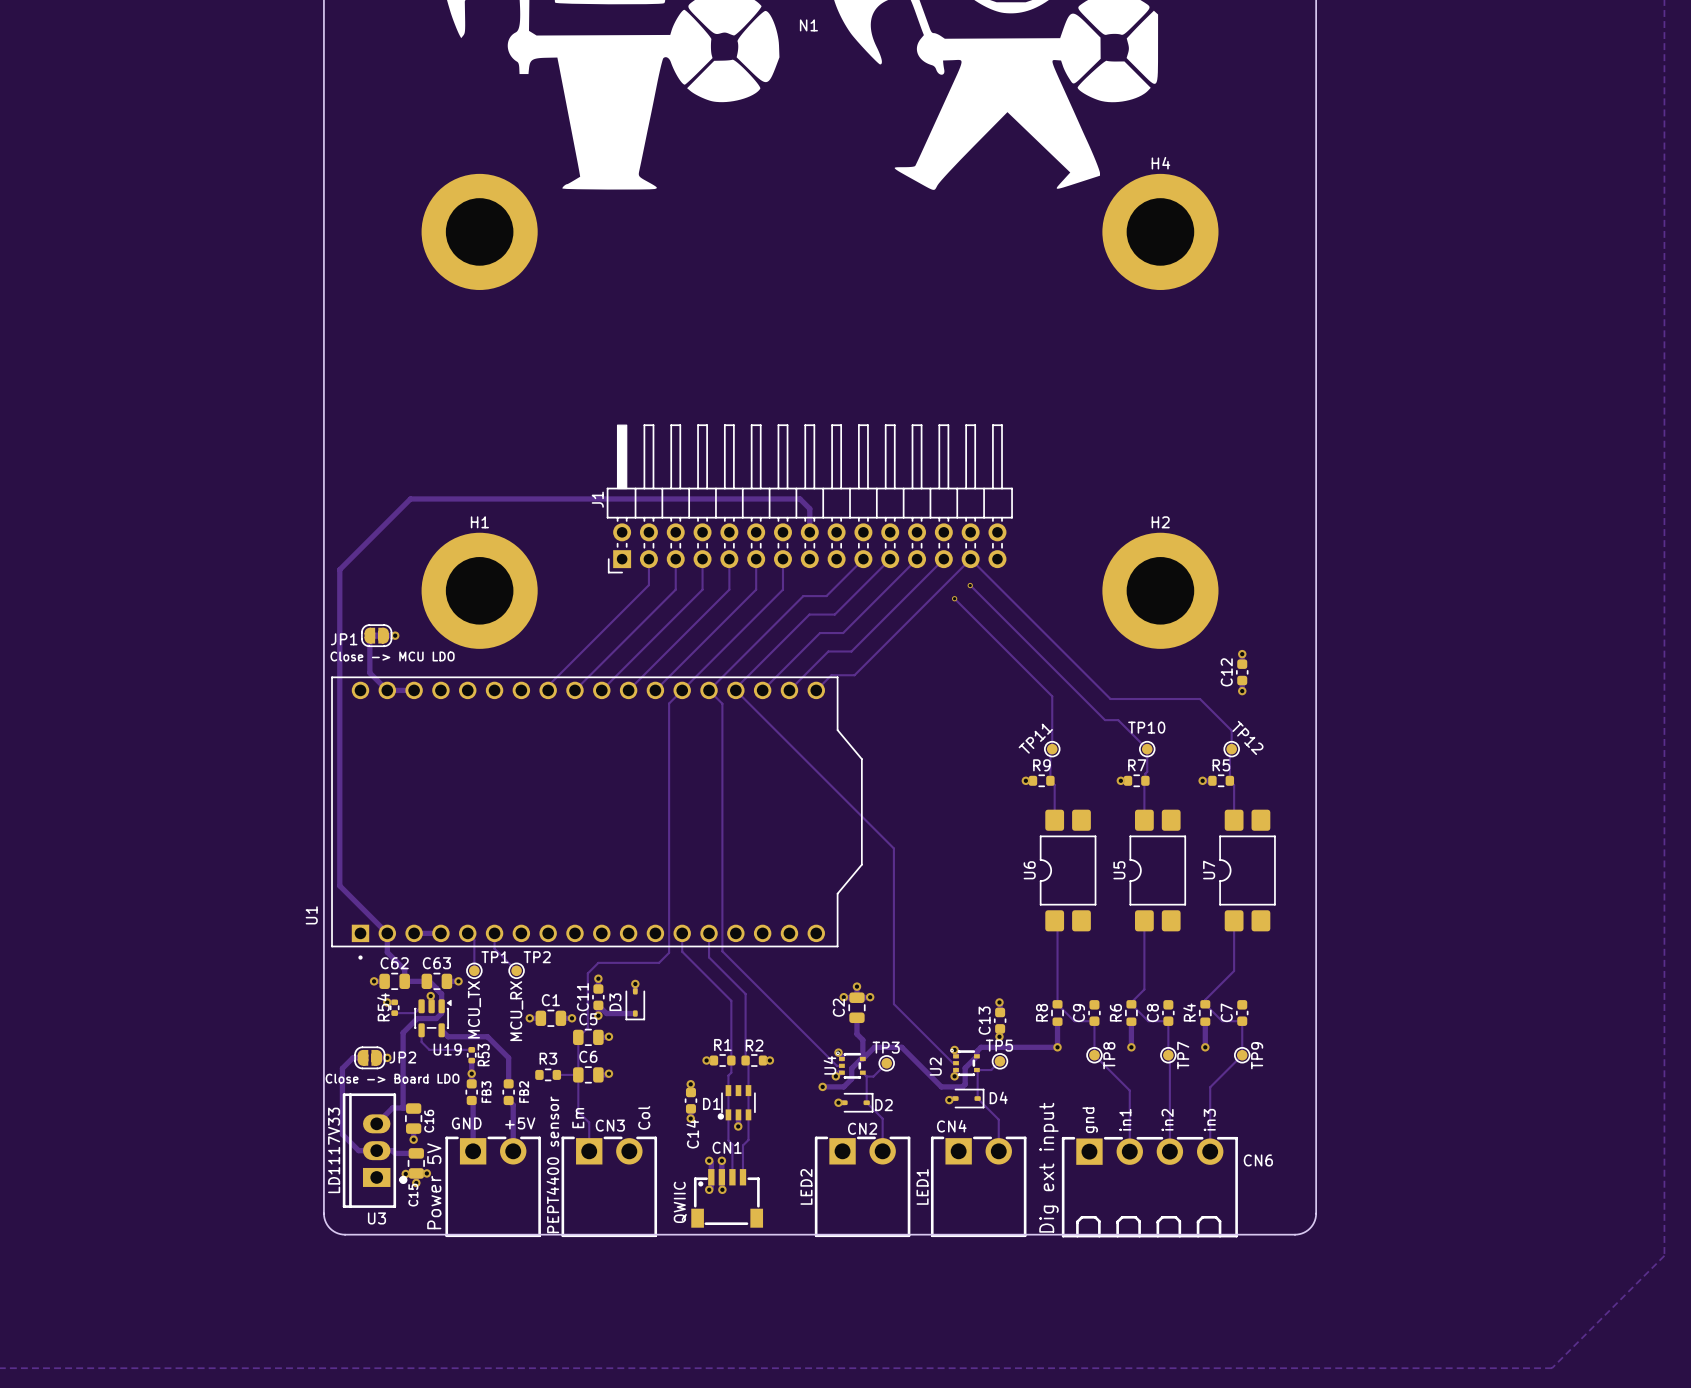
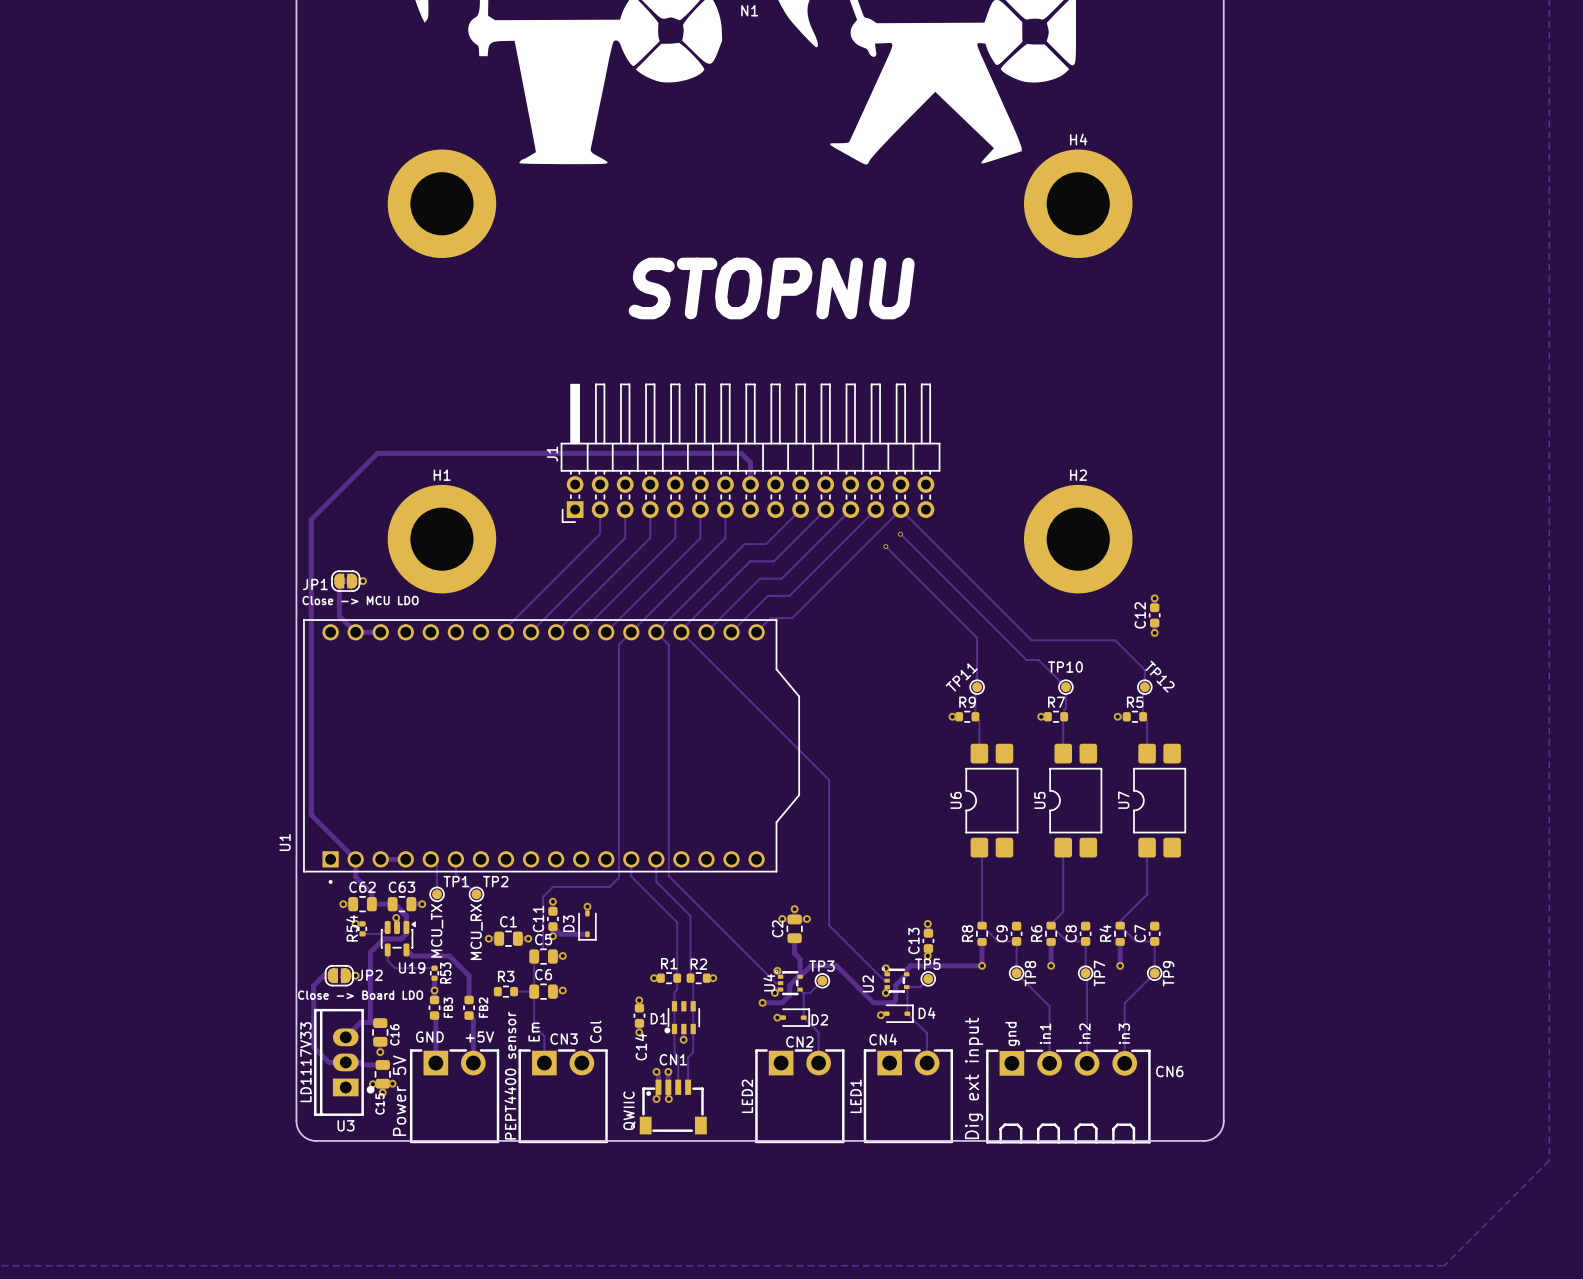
text: none -> STOPNU (771, 288)

